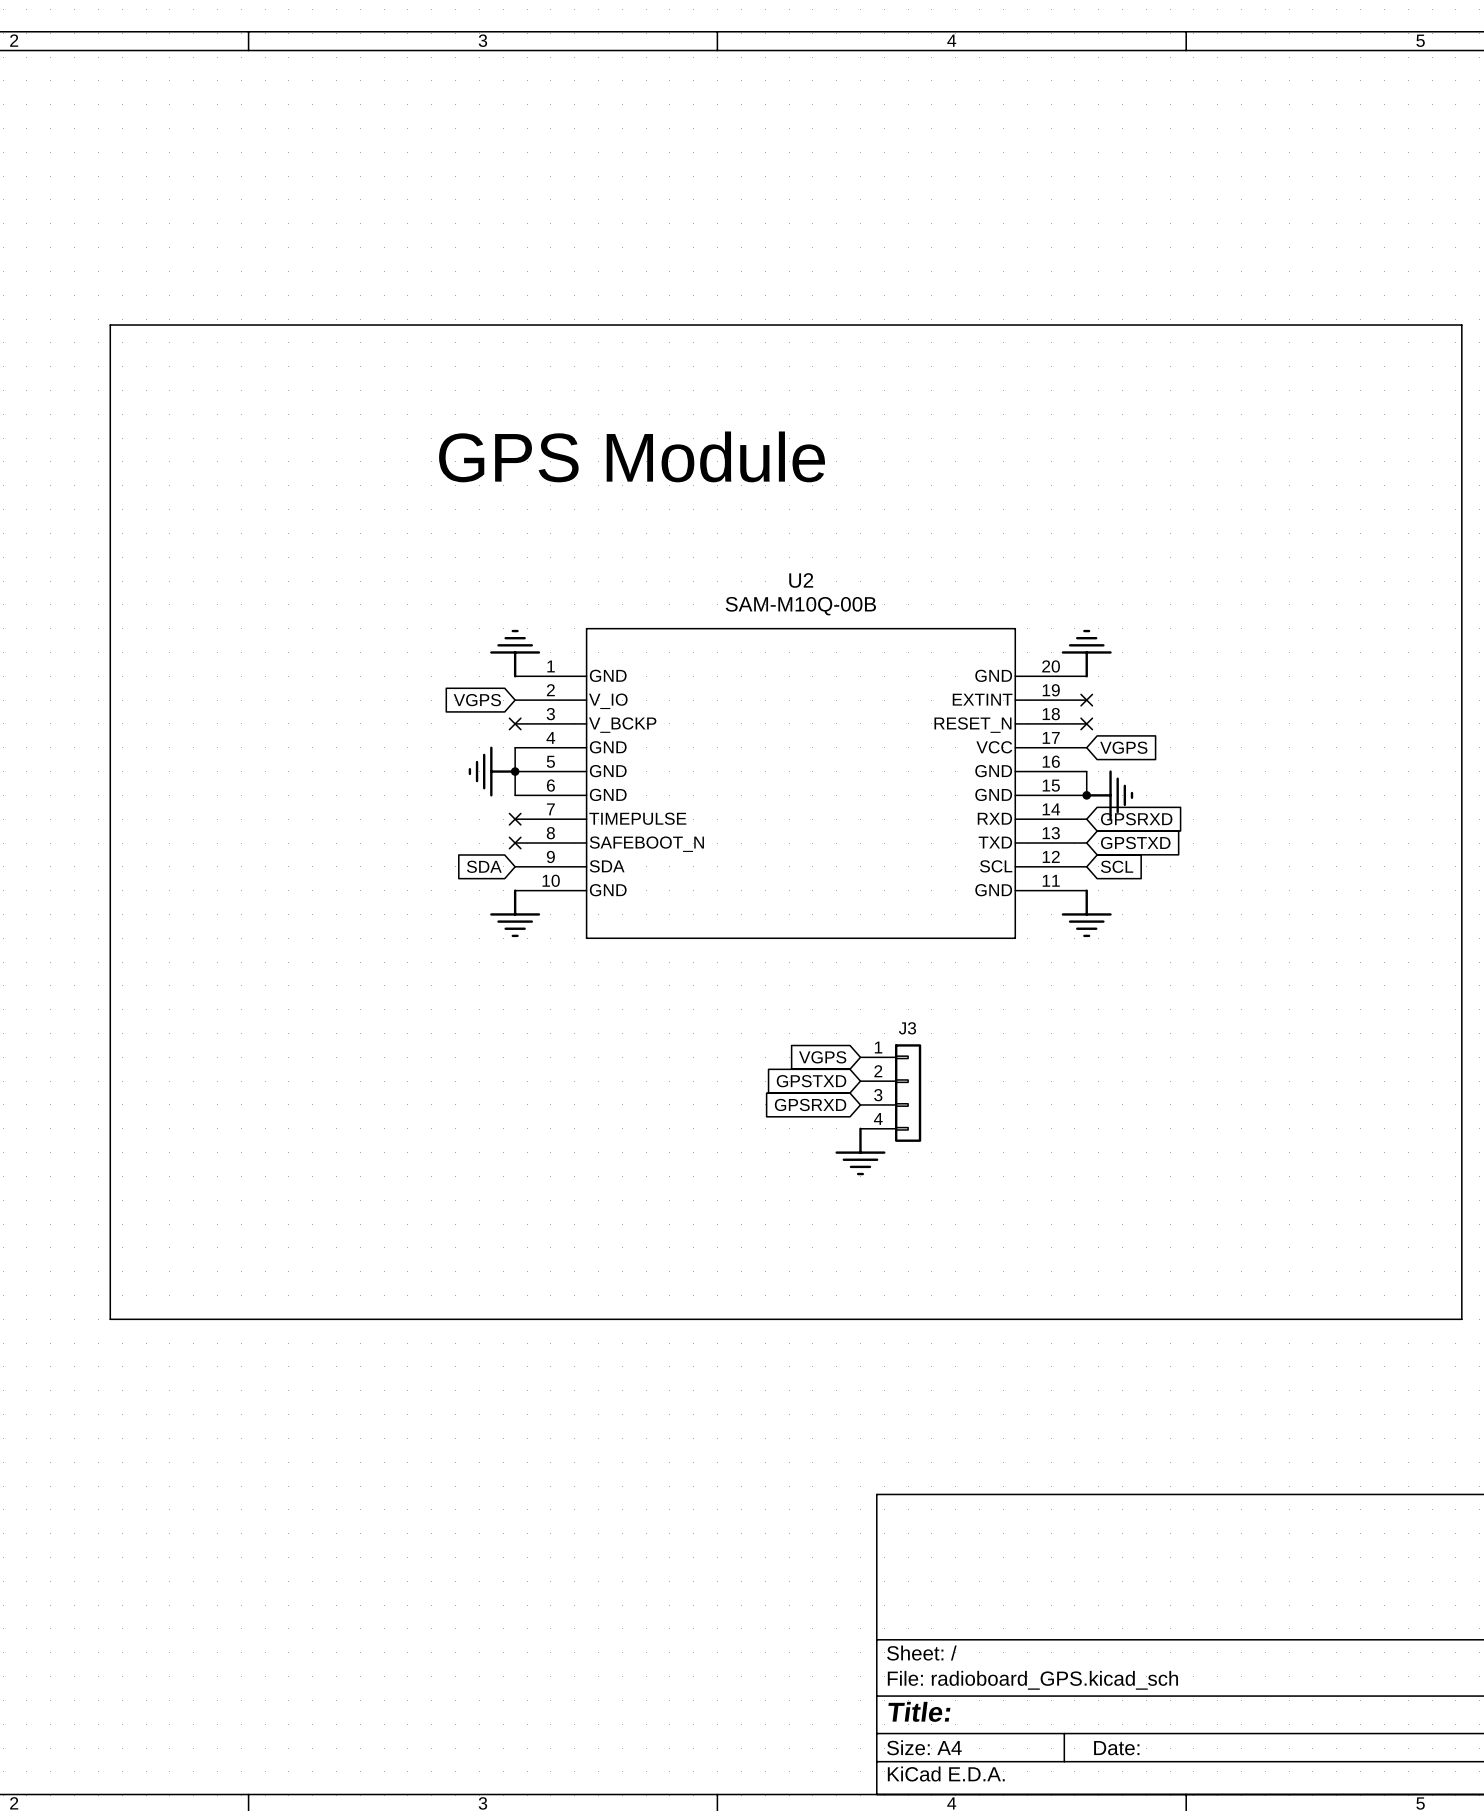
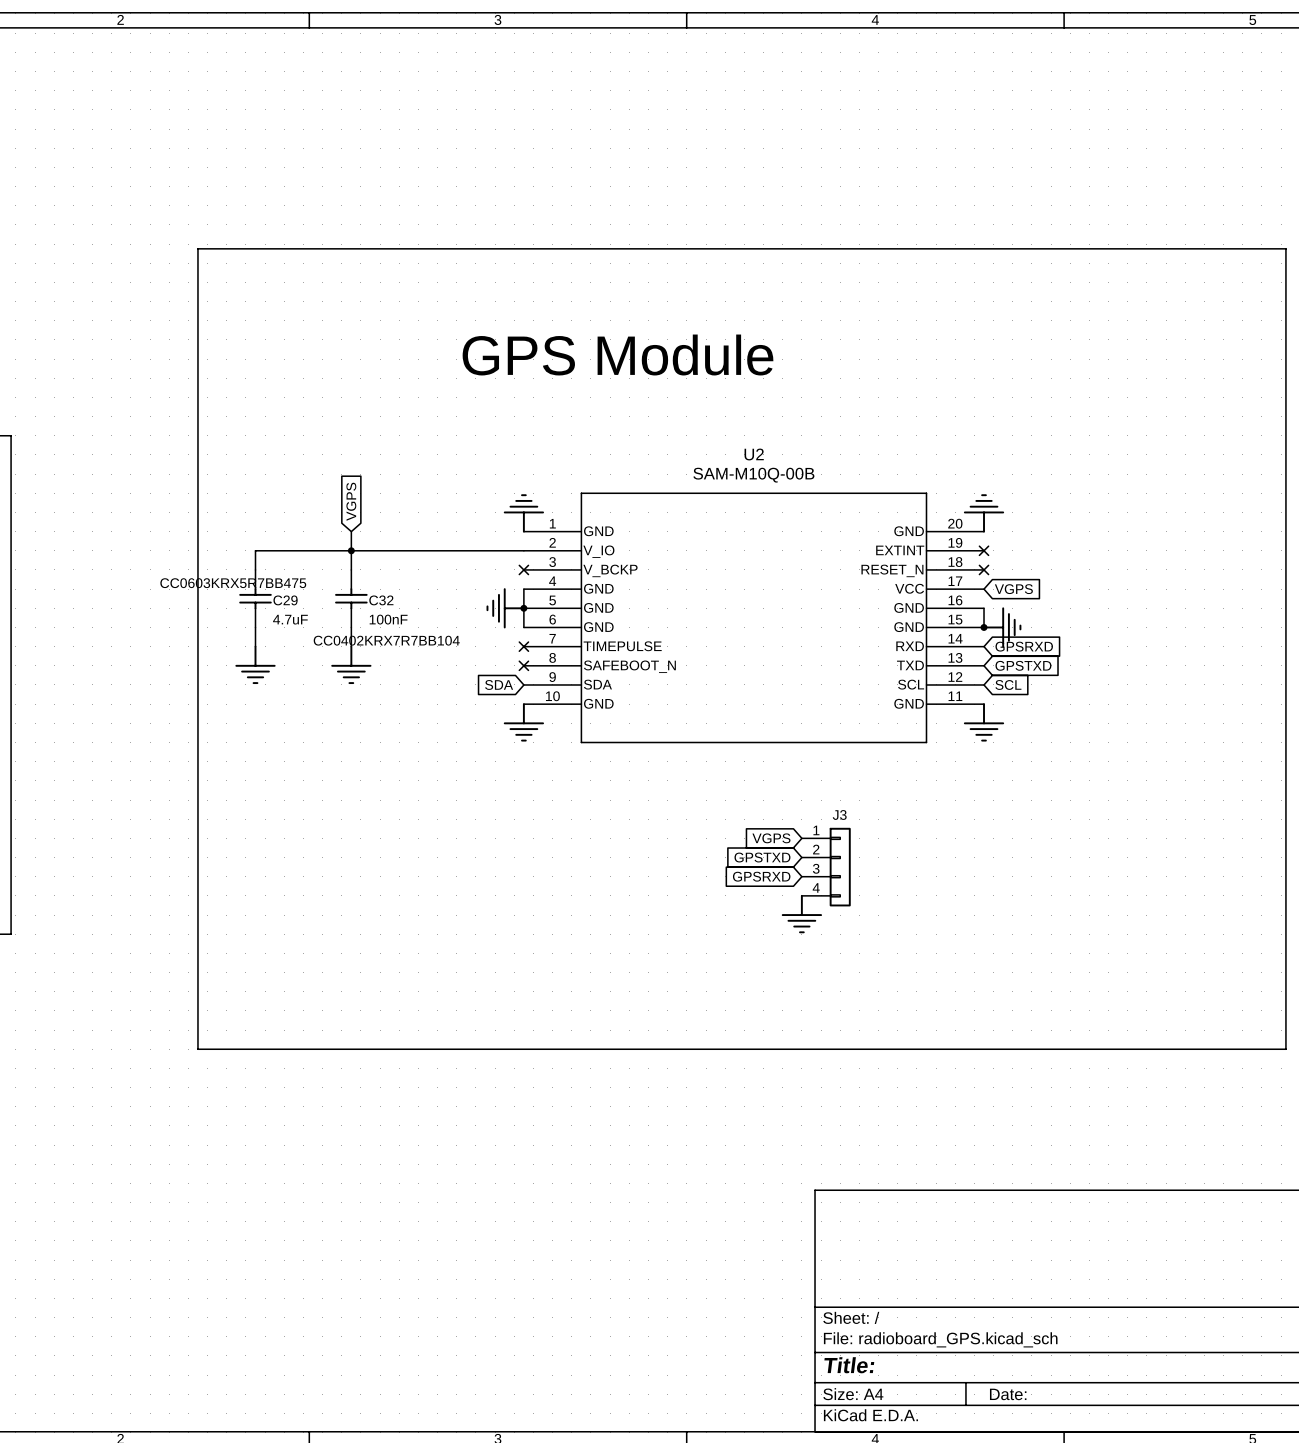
wire: none -> (351, 531) (351, 569)
junction: none -> (351, 550)
global label rotation: 0° (477, 700) -> 90° clockwise (351, 501)
global label position: VGPS (477, 700) -> VGPS (351, 501)
wire: none -> (523, 550) (255, 550) (255, 569)
C29: none -> (255, 598)
C32: none -> (351, 598)
wire: none -> (255, 627) (255, 646)
wire: none -> (351, 627) (351, 646)
power symbol: none -> (255, 664)
power symbol: none -> (351, 664)

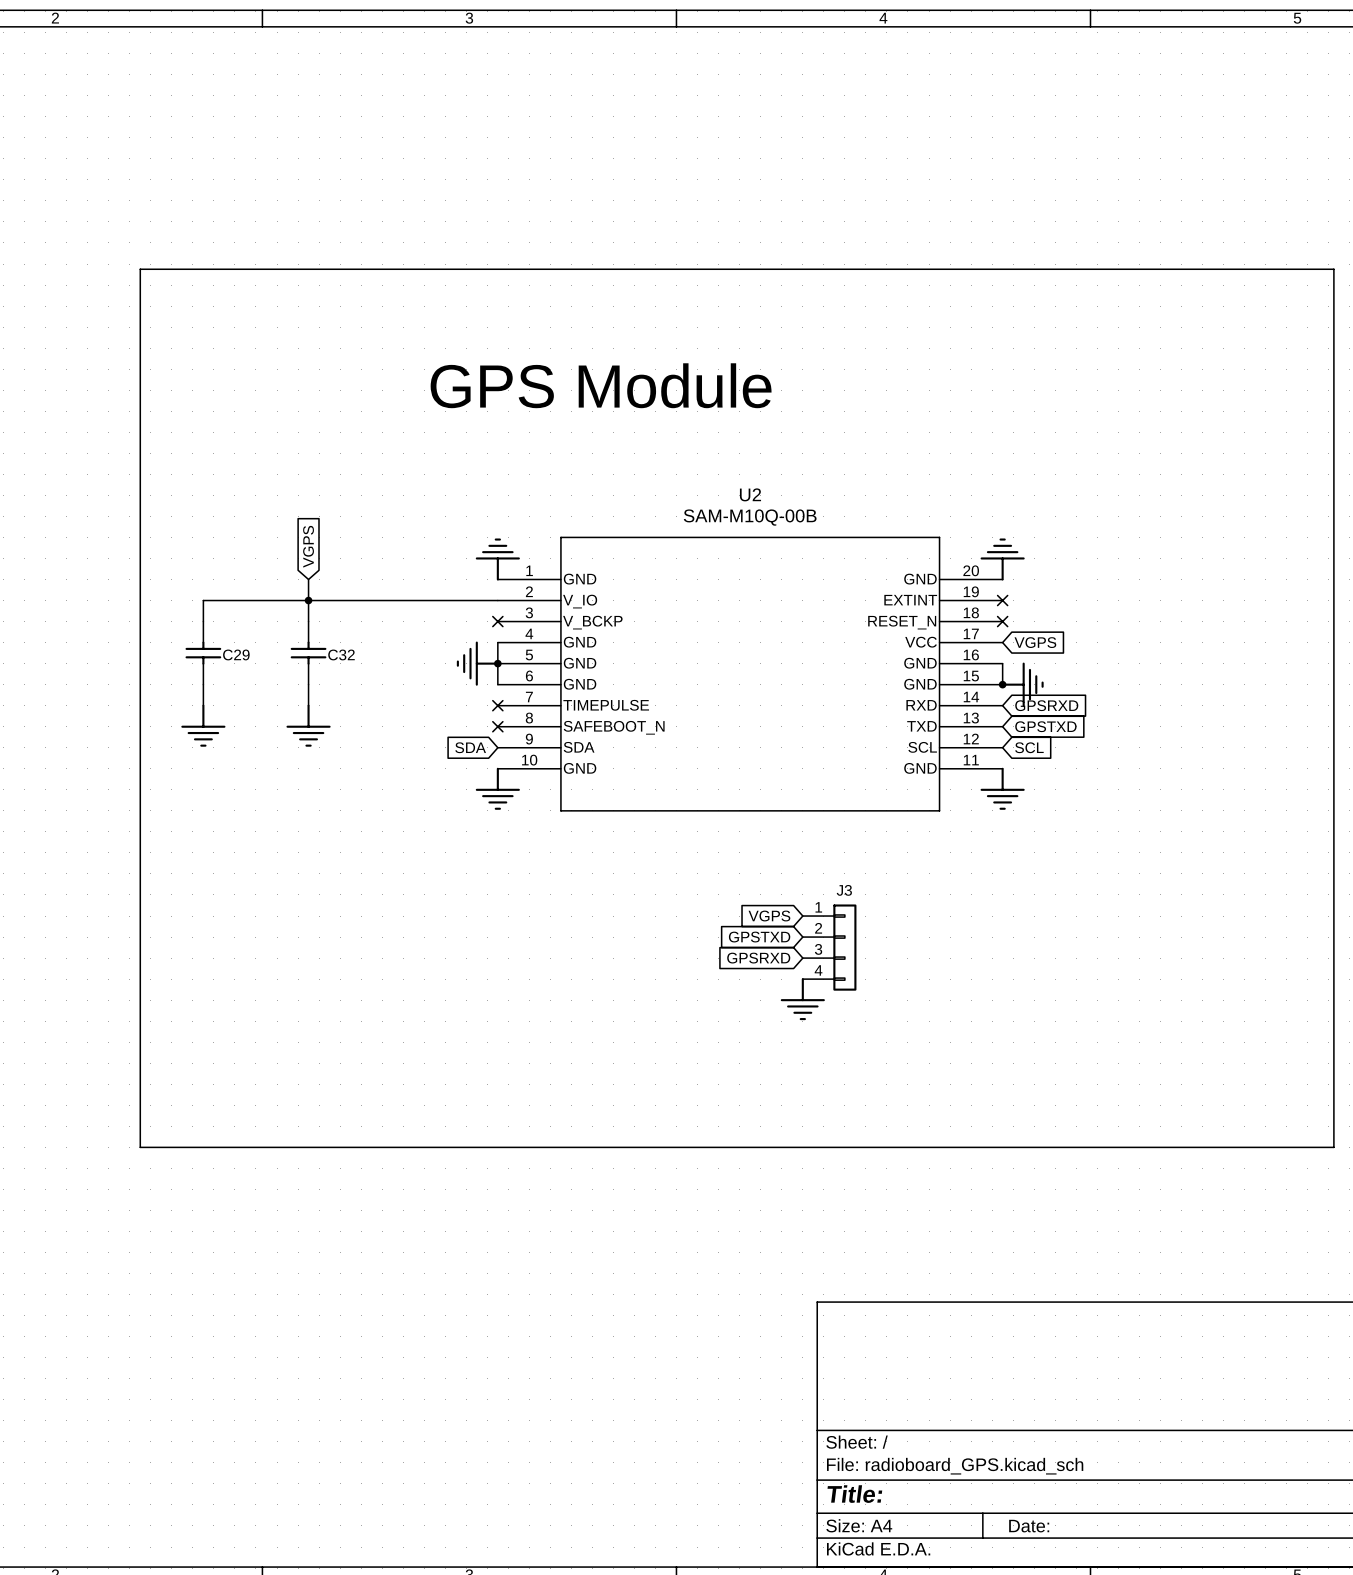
C29 text: CC0603KRX5R7BB475 (233, 583) -> none
C29 text: 4.7uF (290, 619) -> none
C32 text: 100nF (388, 619) -> none
C32 text: CC0402KRX7R7BB104 (386, 640) -> none

